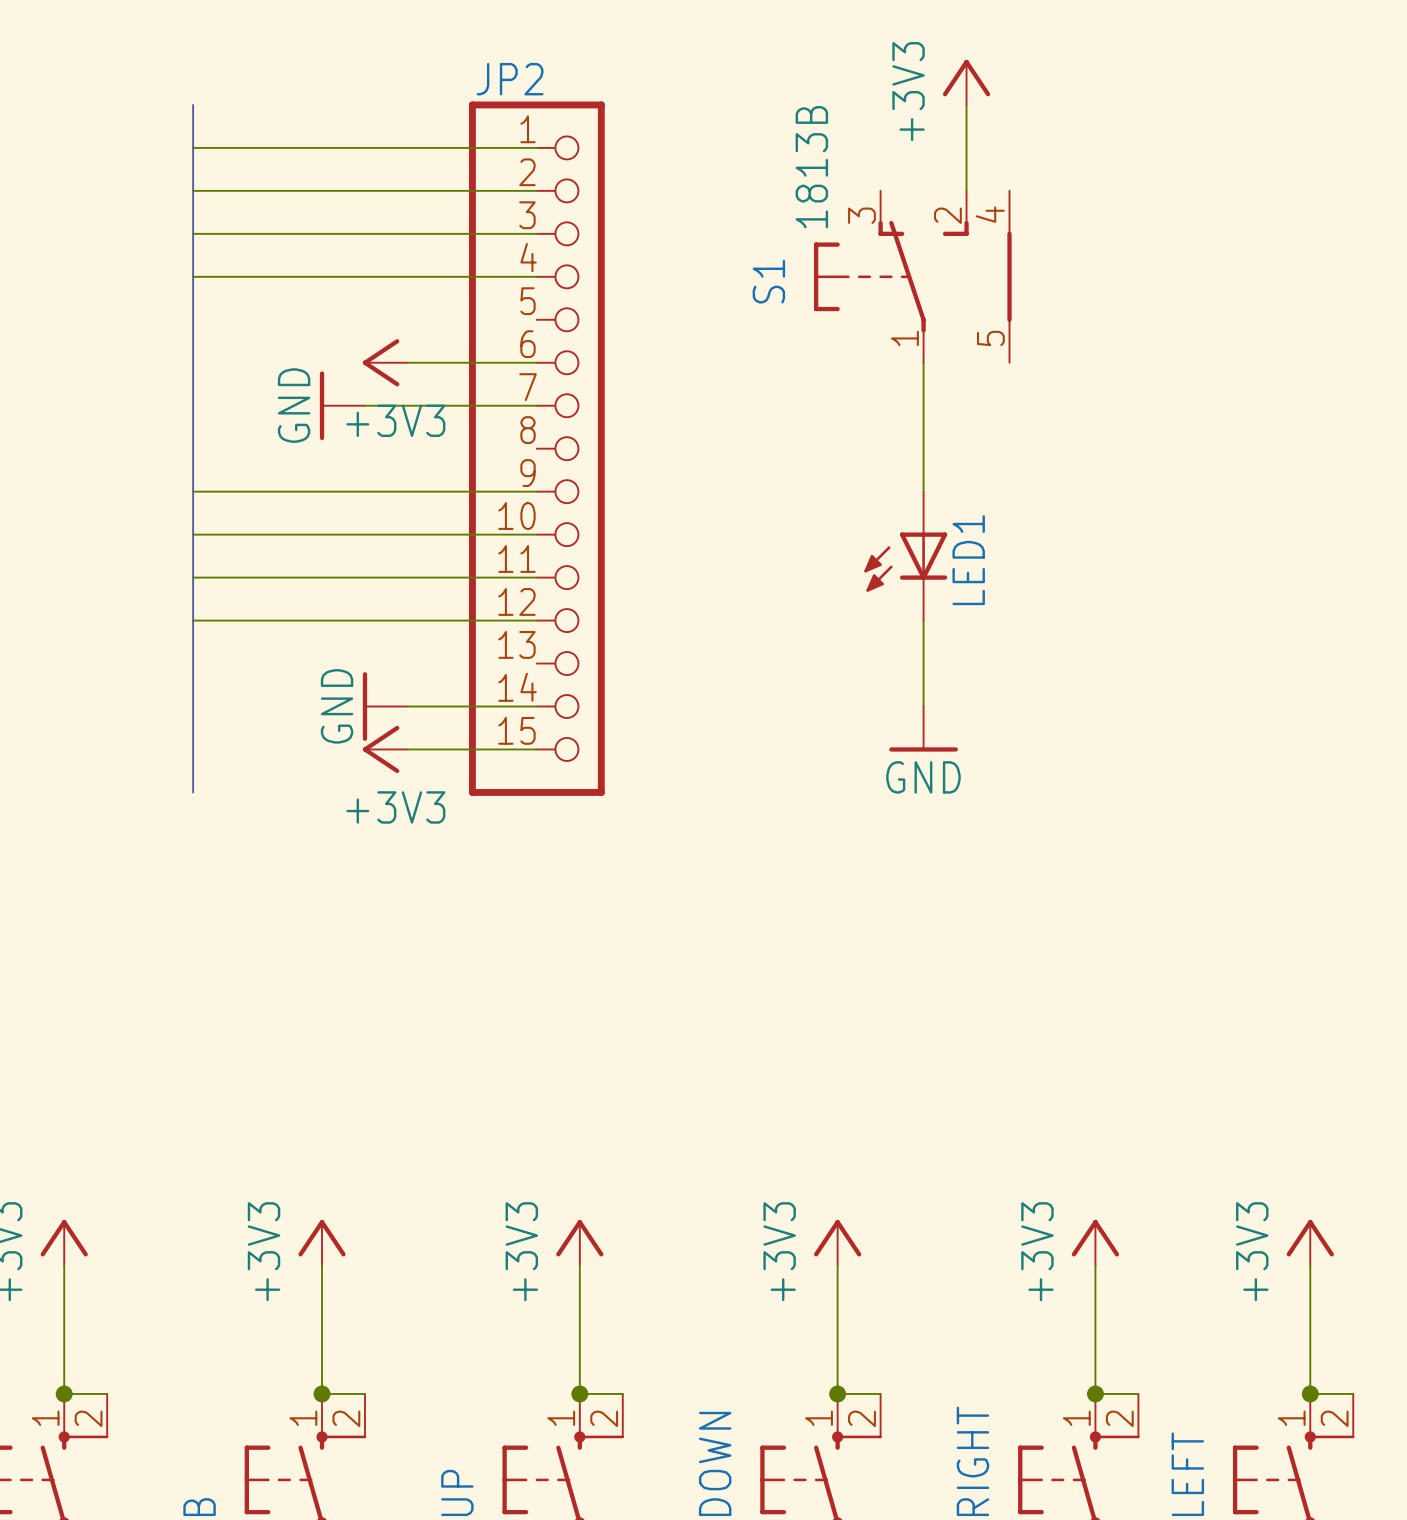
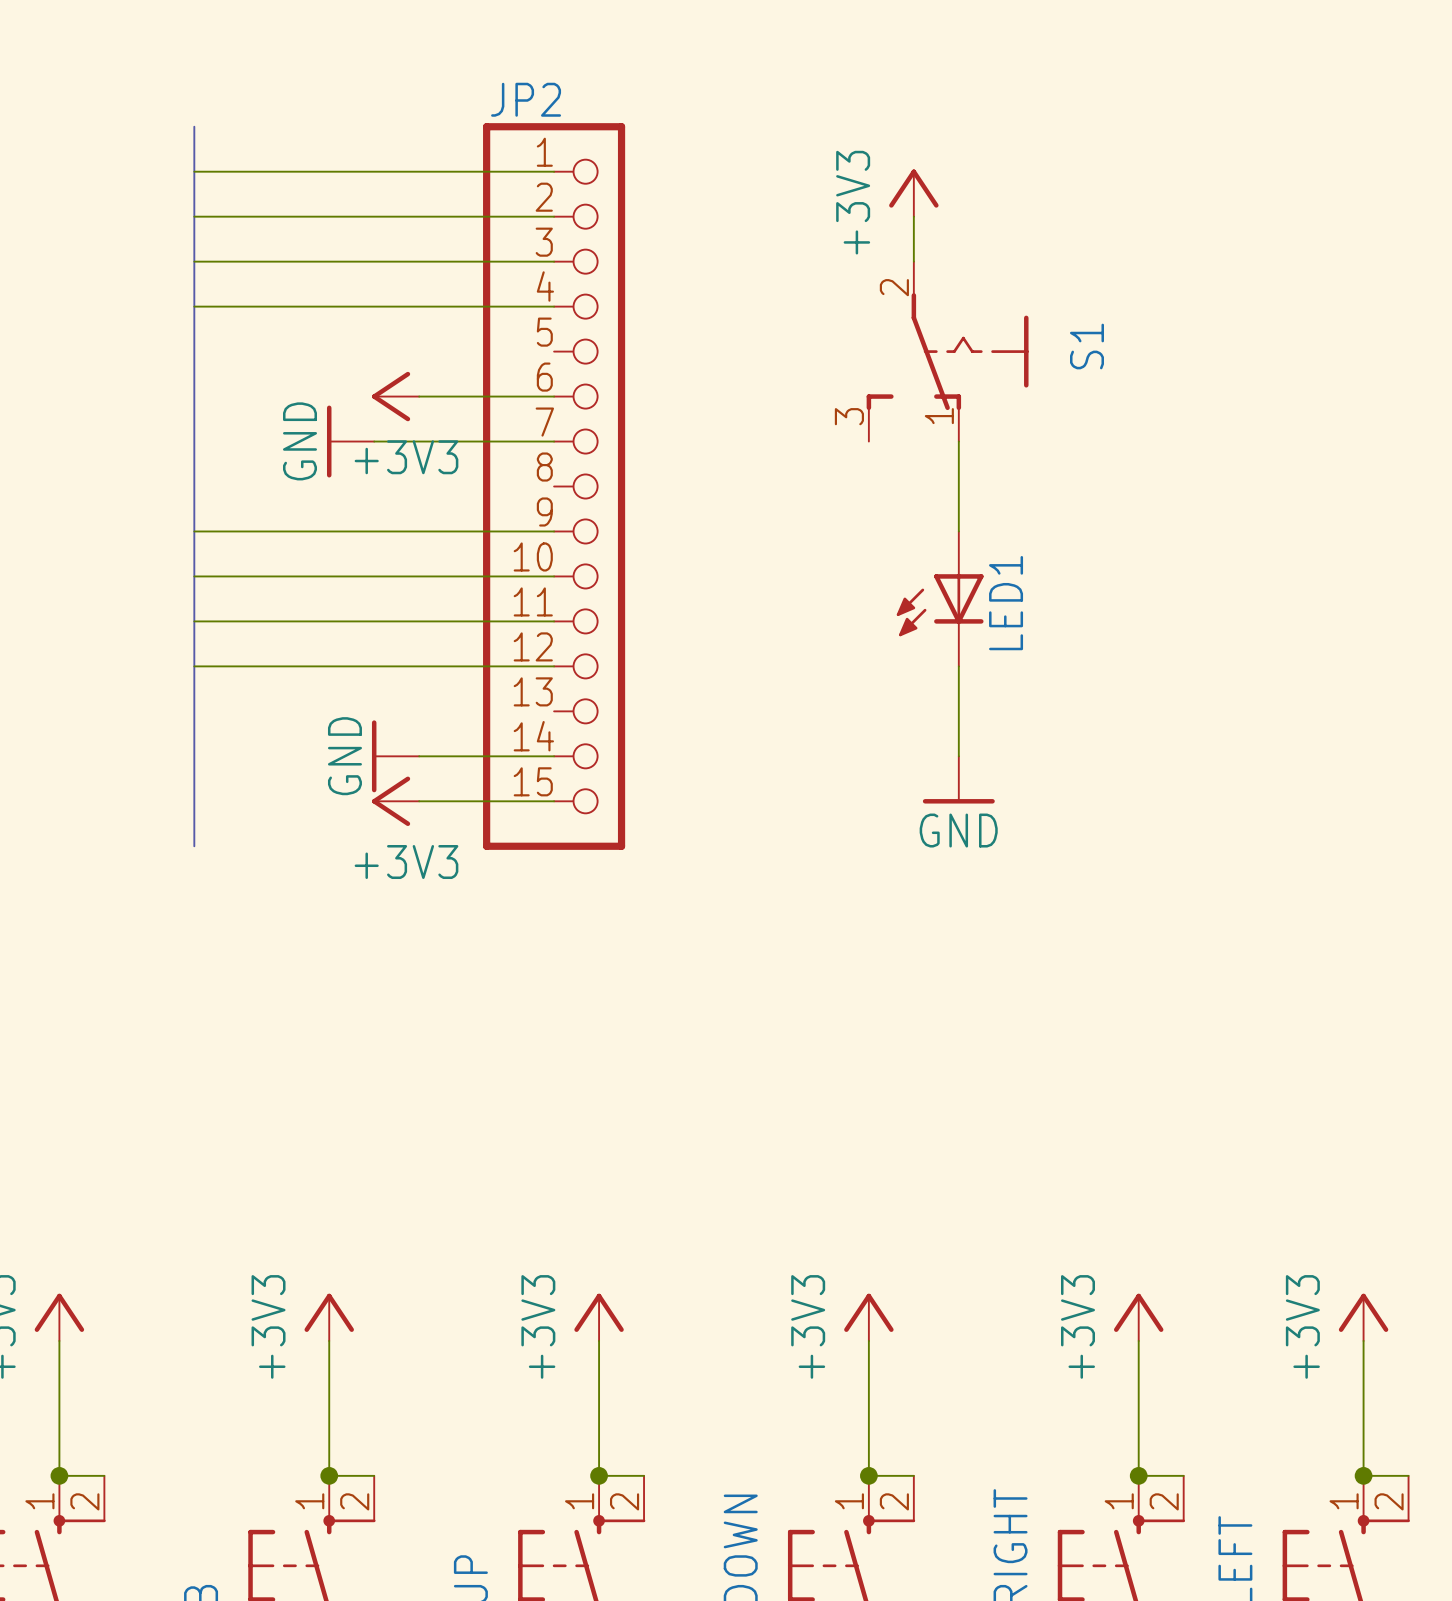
power symbol position: +3V3 (966, 82) -> +3V3 (913, 193)
wire: (966, 104) (966, 190) -> none
S1 value: 1813B (811, 167) -> none
S1 symbol: [814, 190, 1012, 363] -> [866, 261, 1029, 442]
S1 name position: S1 (768, 281) -> S1 (1086, 346)

